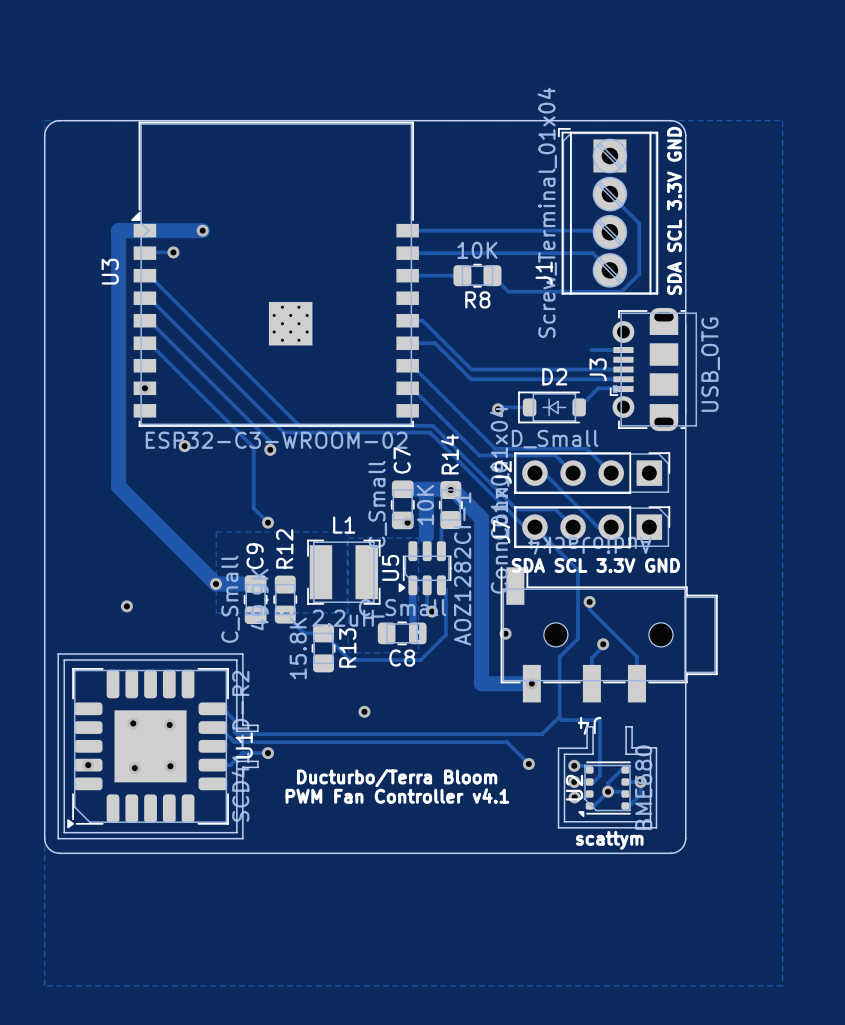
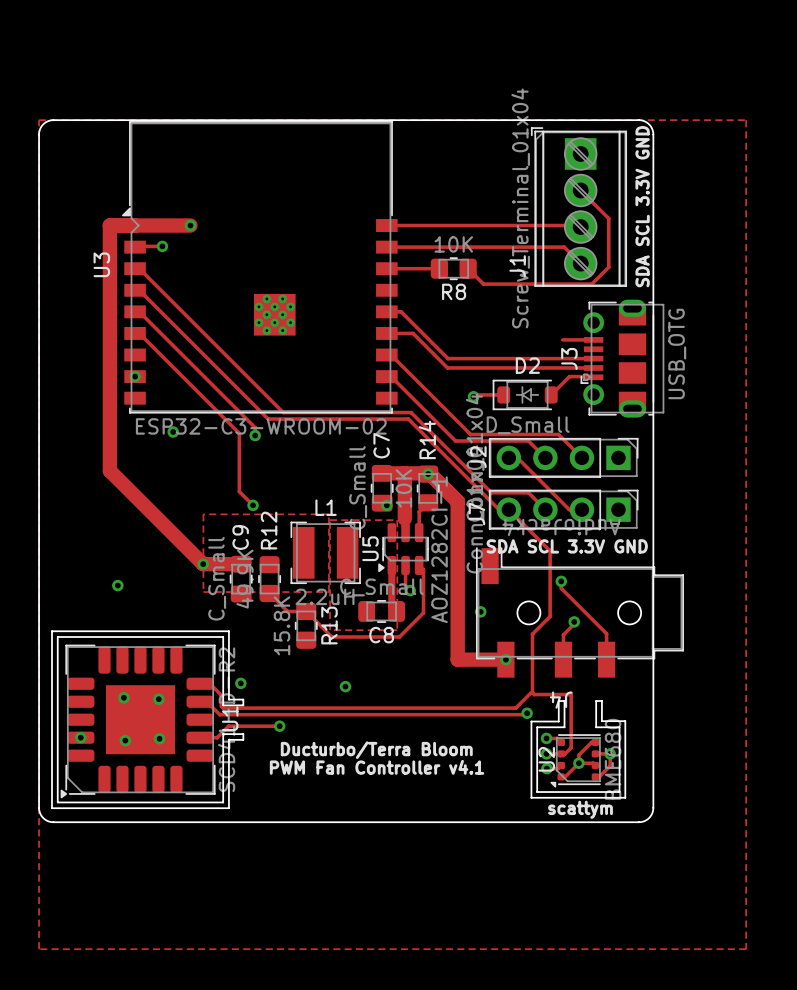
via: none -> (240, 683)
track: (233, 741) (507, 742) (528, 763) -> (219, 714) (527, 713)
track: none -> (253, 726) (279, 726)
via: (268, 753) -> none
via: none -> (279, 726)
via position: (528, 763) -> (527, 713)

